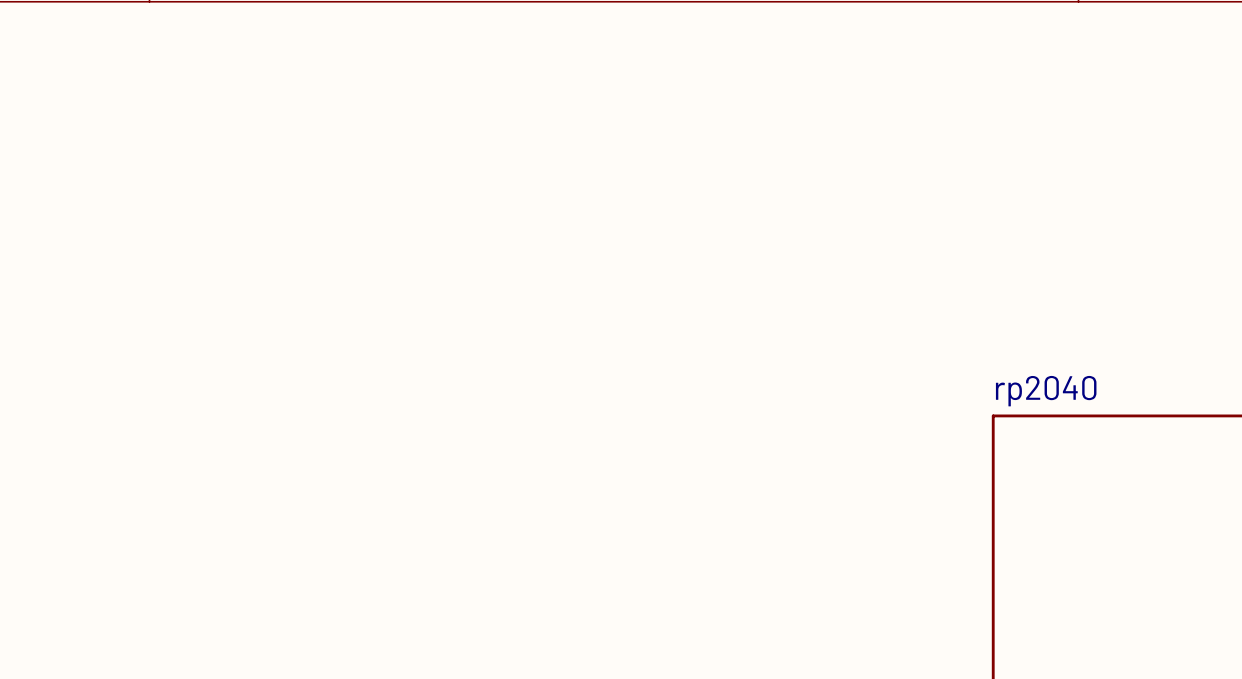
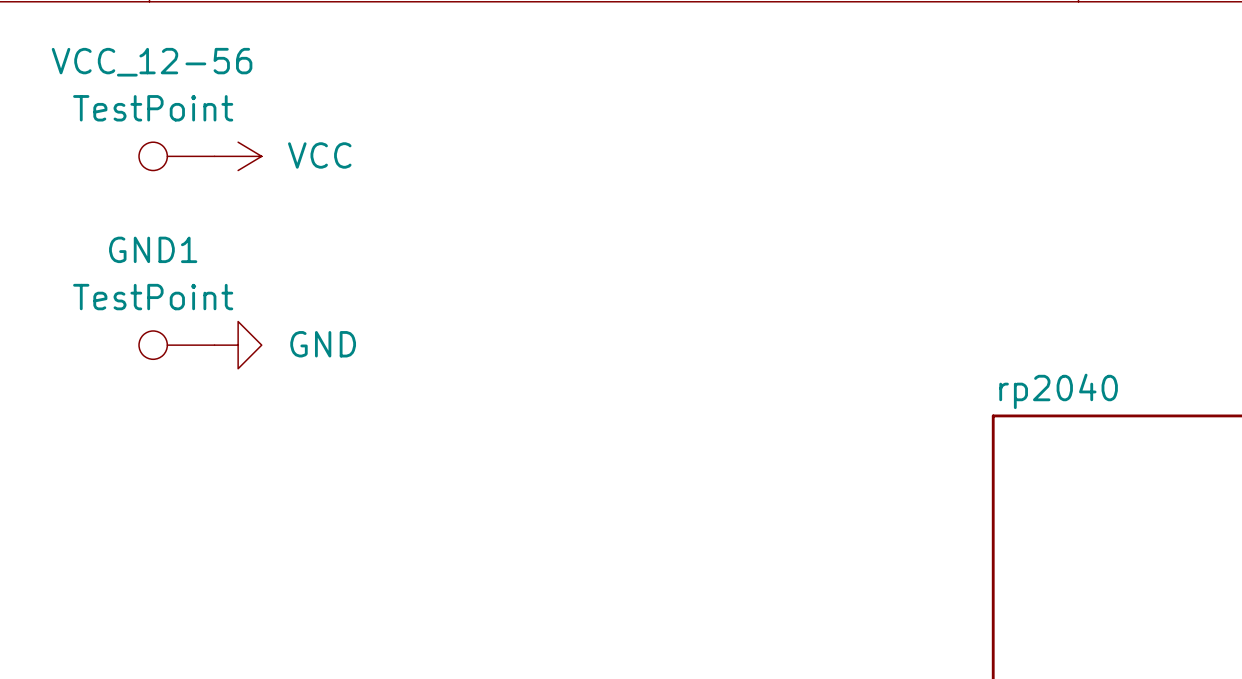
VCC_12-56: none -> TestPoint (176, 156)
power symbol: none -> VCC (238, 156)
GND1: none -> TestPoint (176, 345)
power symbol: none -> GND (238, 345)

